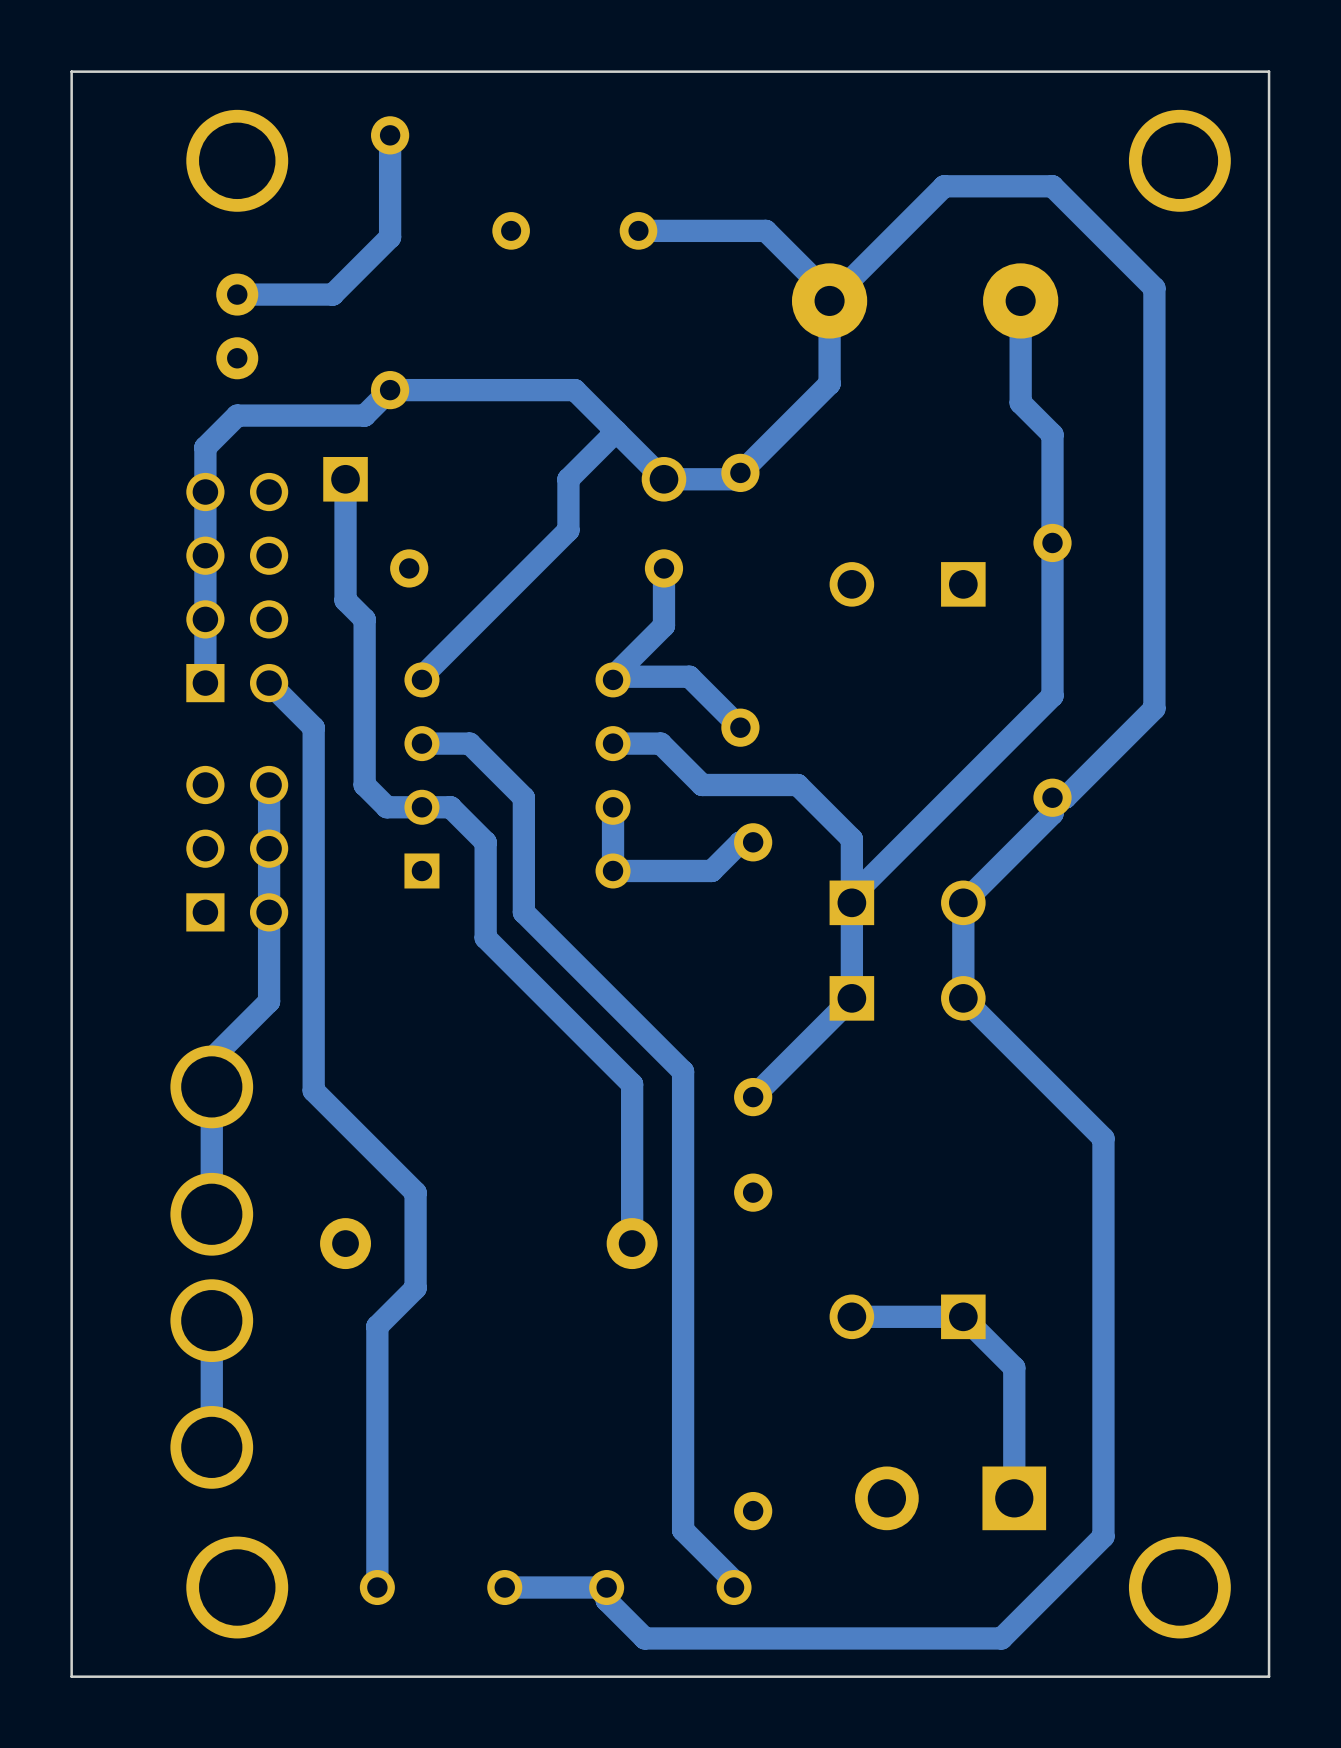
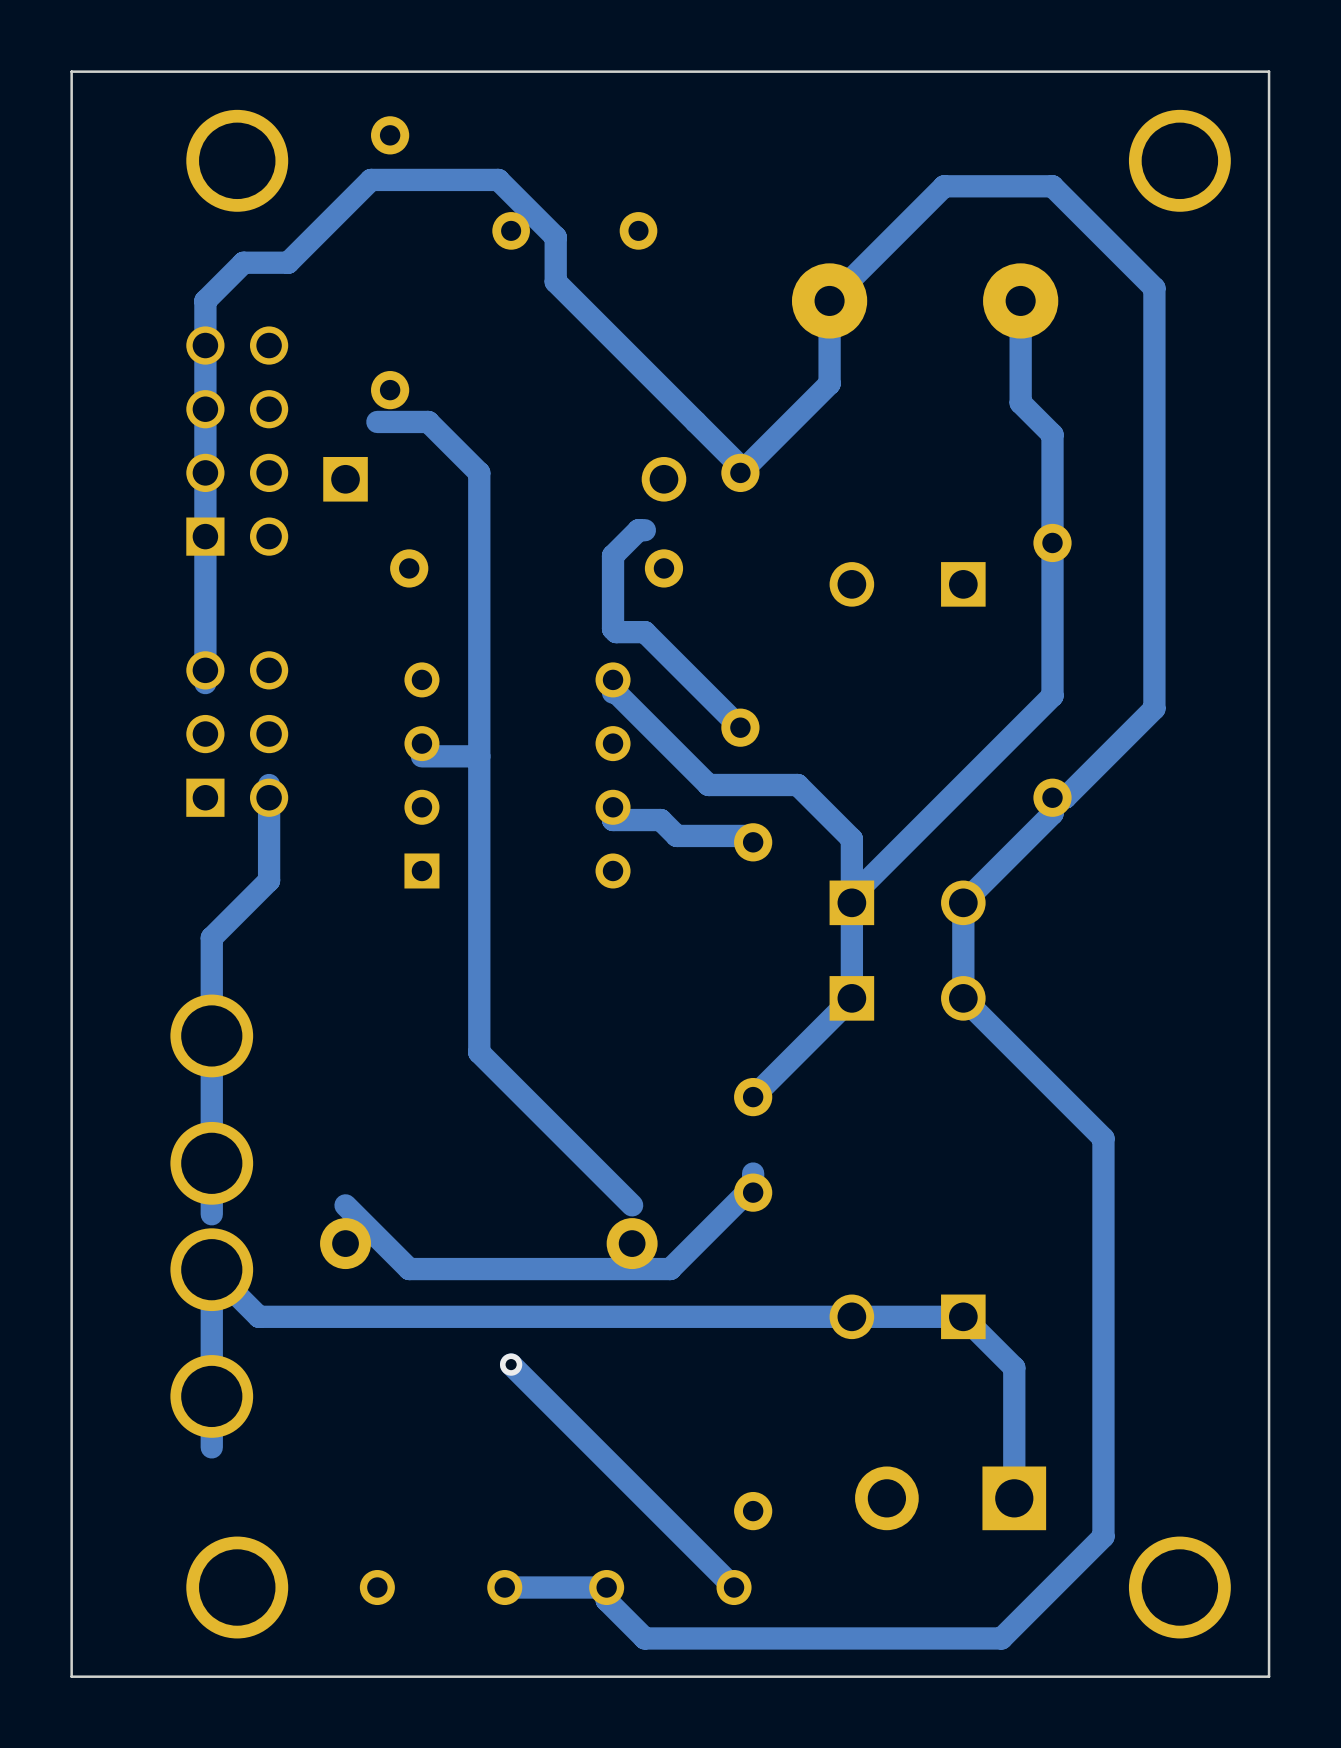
track: (390, 135) (390, 237) (332, 294) (237, 294) -> none
track: (638, 230) (765, 230) (829, 294) (829, 300) -> none
part: (237, 326) -> none
track: none -> (377, 421) (428, 421) (479, 472) (479, 1052) (632, 1205)
track: (616, 431) (568, 479) (568, 530) (421, 676) (421, 679) -> none
track: (205, 447) (237, 415) (364, 415) (390, 390) (574, 390) (663, 479) (734, 479) (740, 472) -> (205, 447) (205, 300) (243, 262) (288, 262) (371, 179) (498, 179) (555, 237) (555, 281) (740, 466) (740, 472)
track: (345, 479) (345, 600) (364, 619) (364, 785) (386, 807) (450, 807) (485, 842) (485, 937) (632, 1084) (632, 1243) -> none
track: (663, 568) (663, 625) (613, 676) (613, 679) (616, 676) (689, 676) -> (644, 530) (638, 530) (613, 555) (613, 628) (616, 632) (644, 632) (689, 676)
part position: (237, 587) -> (237, 441)
track: (269, 683) (313, 727) (313, 1090) (415, 1192) (415, 1288) (377, 1326) (377, 1587) -> none
track: (421, 743) (469, 743) (523, 797) (523, 912) (683, 1071) (683, 1530) (734, 1581) (734, 1587) -> (511, 1364) (734, 1587)
track: (613, 743) (660, 743) (702, 785) (708, 785) -> (613, 692) (616, 692) (708, 785)
track: none -> (479, 756) (421, 756)
track: (613, 820) (613, 870) (711, 870) (740, 842) (753, 842) -> (613, 820) (660, 820) (676, 835) (746, 835) (753, 842)
part position: (237, 848) -> (237, 734)
track: (269, 880) (269, 1001) (211, 1058) -> (269, 880) (211, 937) (211, 1058)
track: none -> (753, 1173) (753, 1186) (670, 1269) (409, 1269) (345, 1205)
part position: (211, 1267) -> (211, 1216)
track: none -> (851, 1316) (258, 1316) (211, 1269) (211, 1320)
via: none -> (511, 1364)

